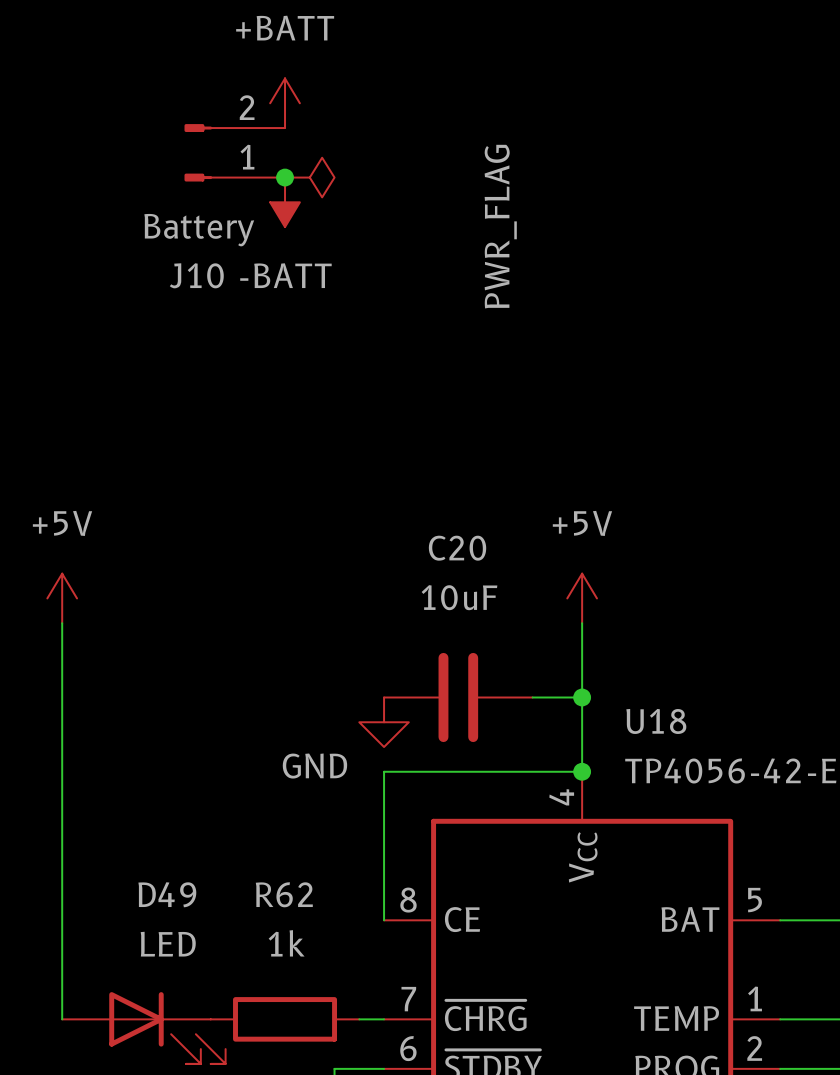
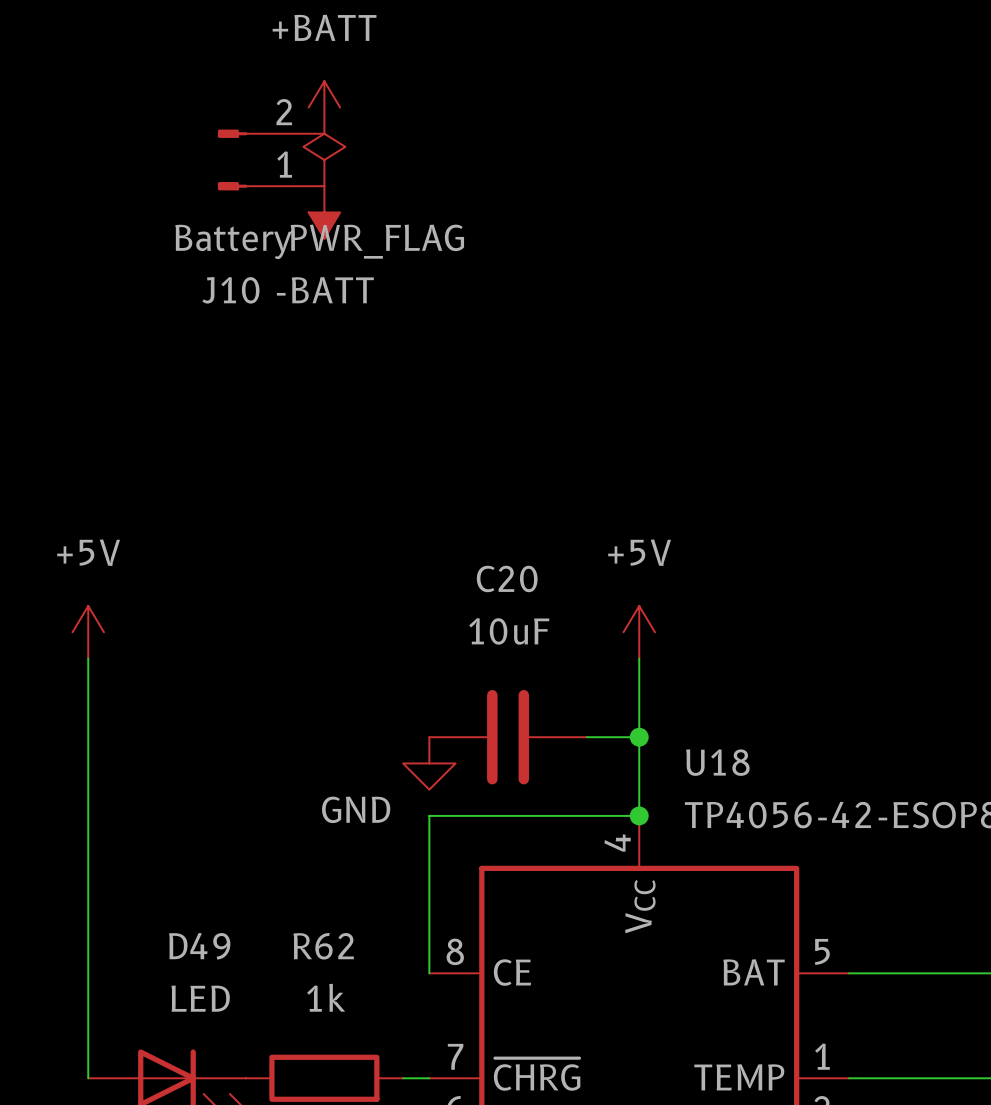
junction: (285, 177) -> none
power symbol rotation: 0° (309, 177) -> 90° counterclockwise (324, 159)
power symbol position: PWR_FLAG (309, 177) -> PWR_FLAG (324, 159)
power symbol text position: PWR_FLAG (500, 226) -> PWR_FLAG (377, 241)

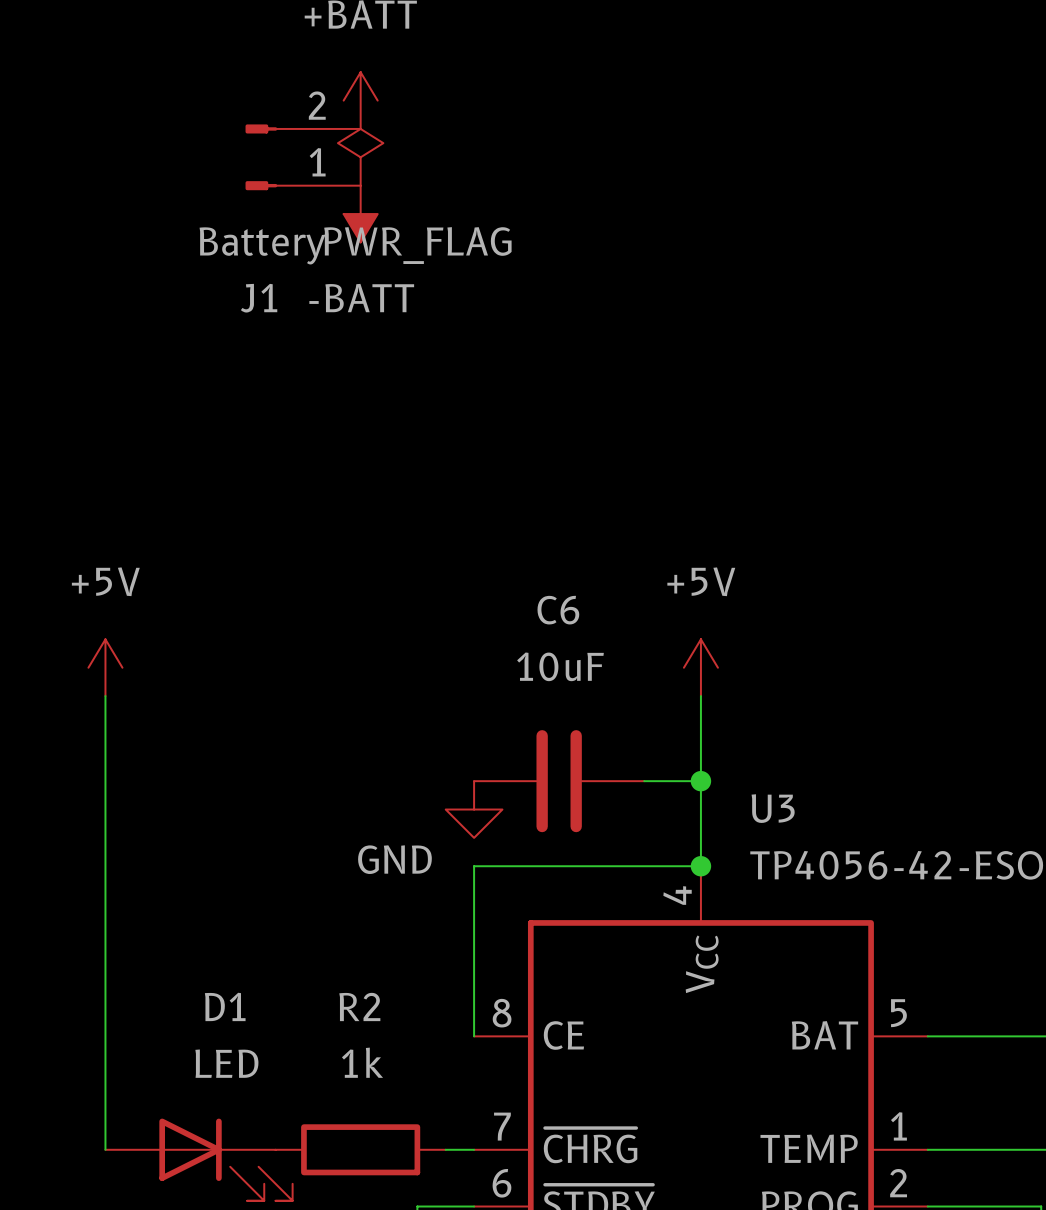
J10 name: J10 (230, 290) -> J1 (259, 298)
C20 name: C20 (507, 578) -> C6 (558, 610)
U18 name: U18 (717, 762) -> U3 (773, 808)
D49 name: D49 (199, 946) -> D1 (225, 1006)
R62 name: R62 (323, 946) -> R2 (359, 1006)

